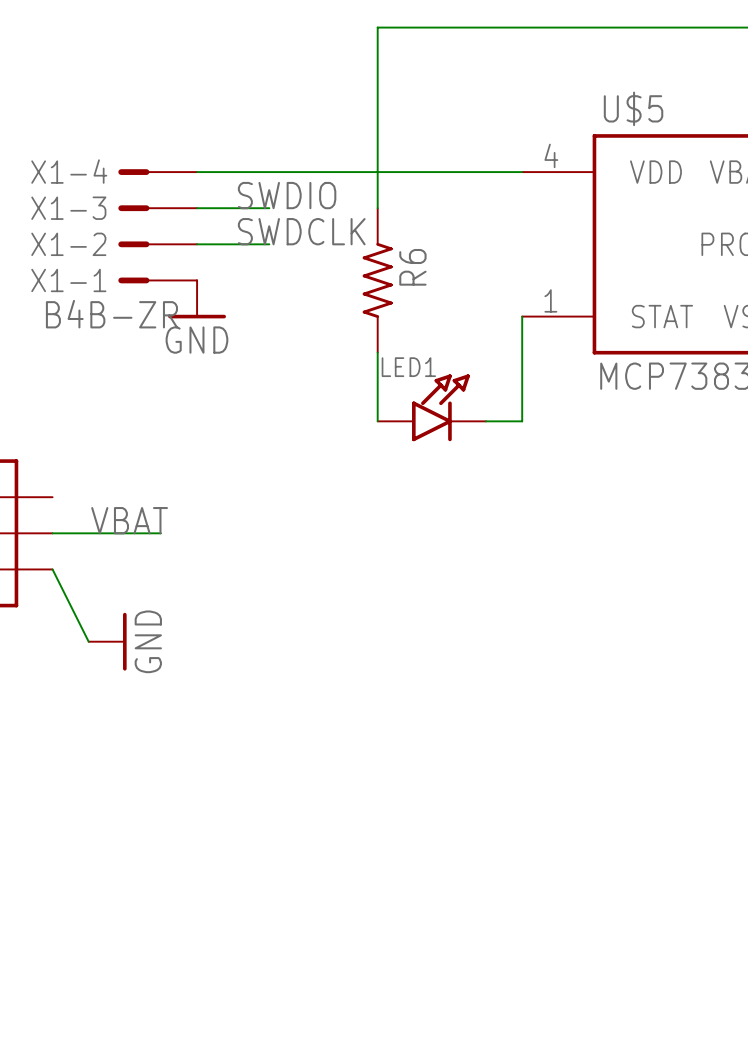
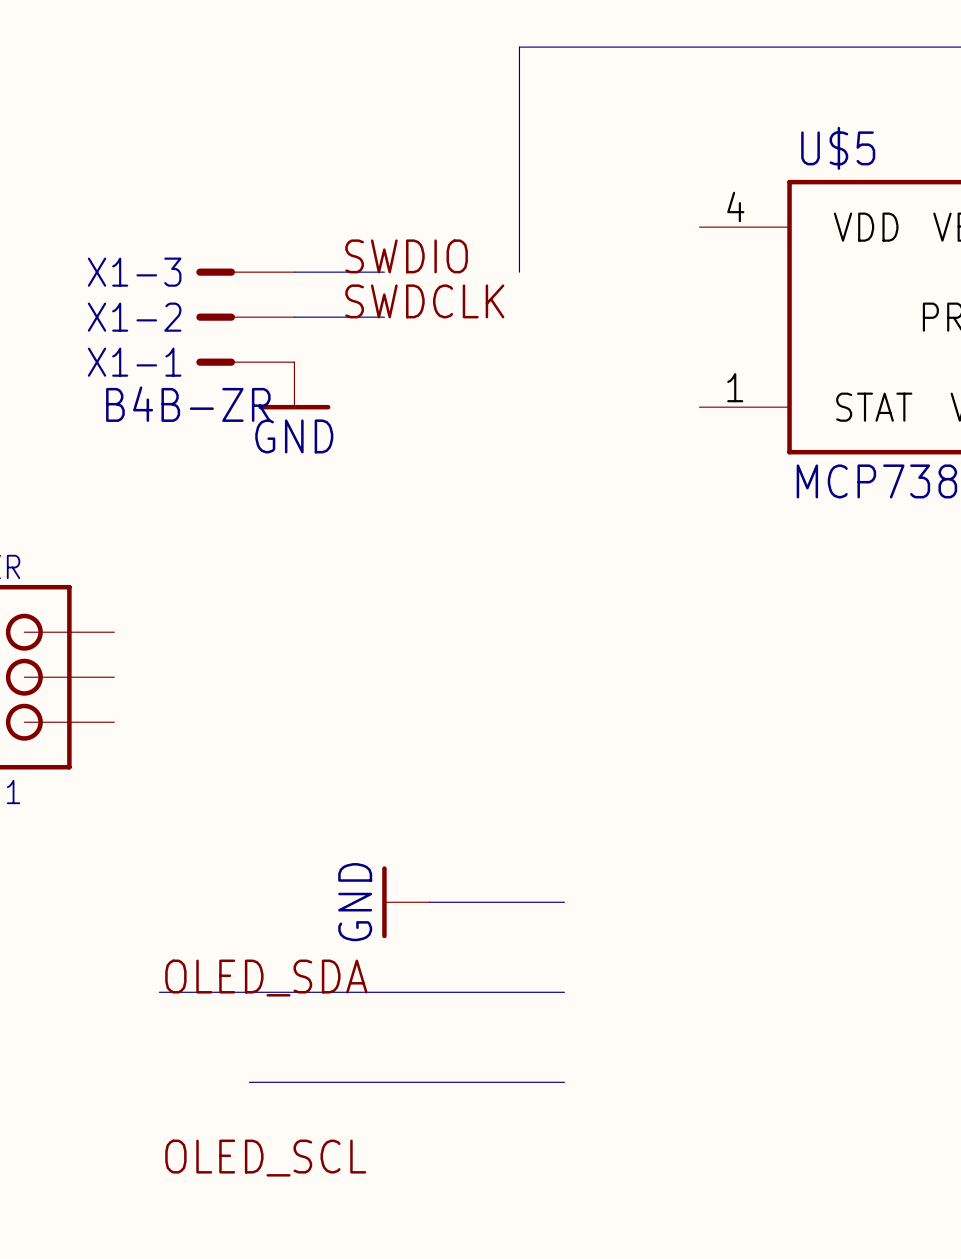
X1-4: (157, 172) -> none
wire: (197, 172) (522, 172) -> none
R6: (377, 280) -> none
wire: (522, 316) (522, 421) (486, 421) -> none
wire: (377, 352) (377, 421) -> none
LED1: (431, 407) -> none
label: VBAT (129, 520) -> none
wire: (52, 533) (160, 533) -> (429, 902) (564, 902)
wire: (52, 569) (88, 641) -> none
power symbol position: GND (107, 641) -> GND (405, 902)
power symbol rotation: 0° (124, 641) -> 180° (384, 902)
label: none -> OLED_SDA (266, 978)
wire: none -> (159, 992) (564, 992)
wire: none -> (249, 1082) (564, 1082)
label: none -> OLED_SCL (265, 1158)

